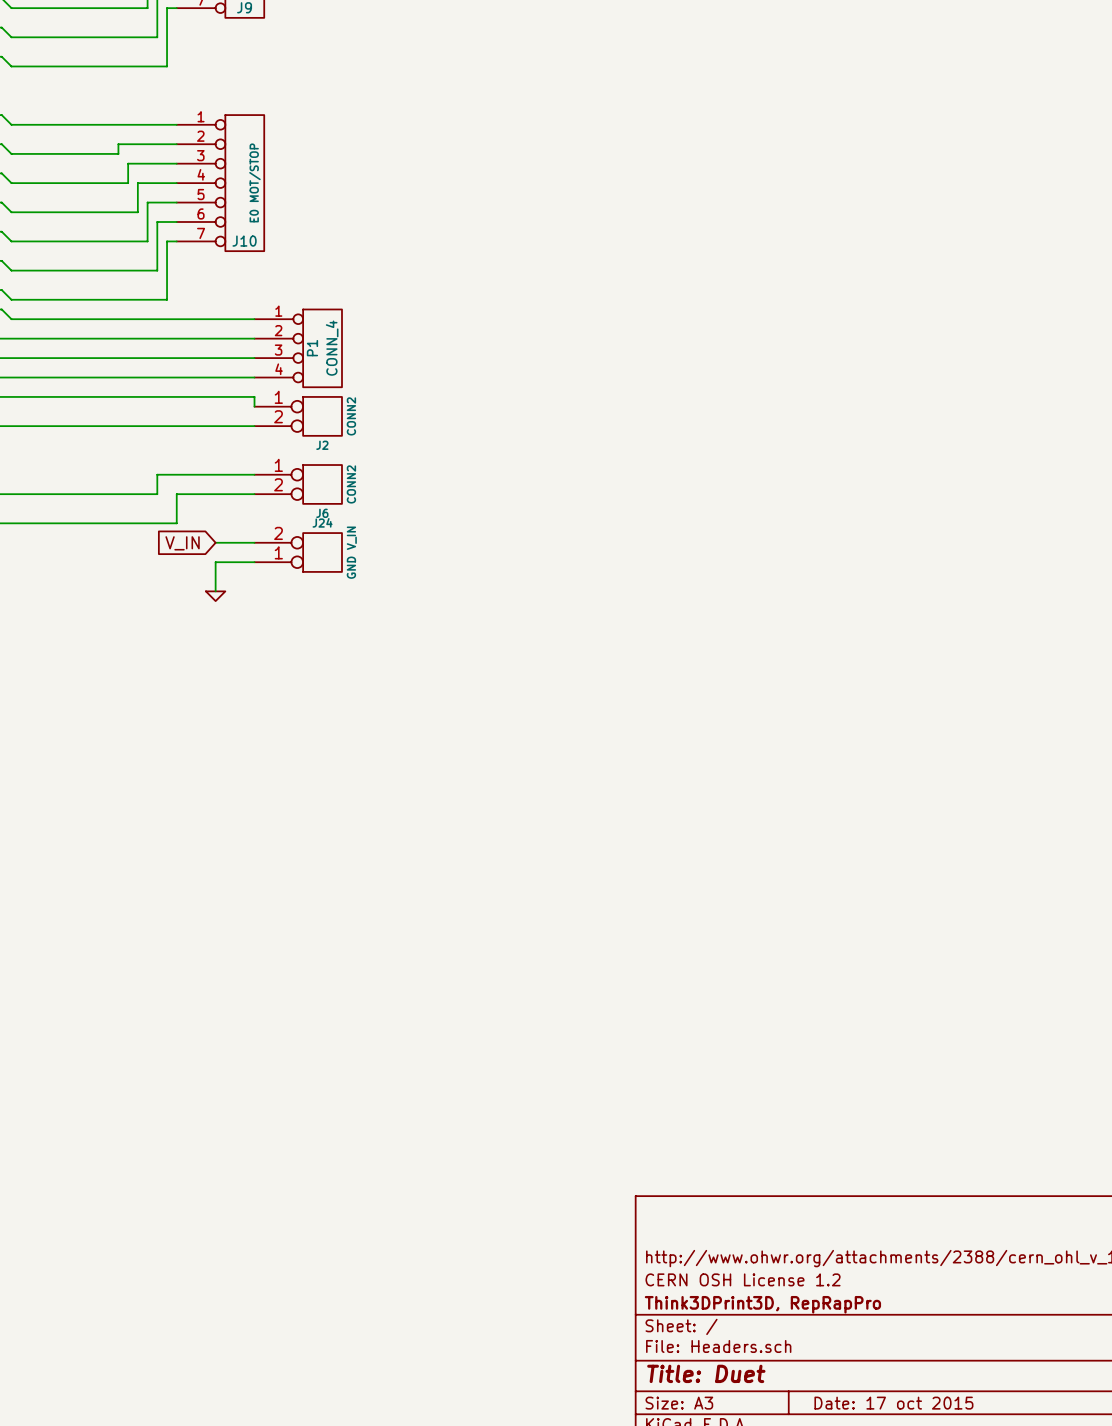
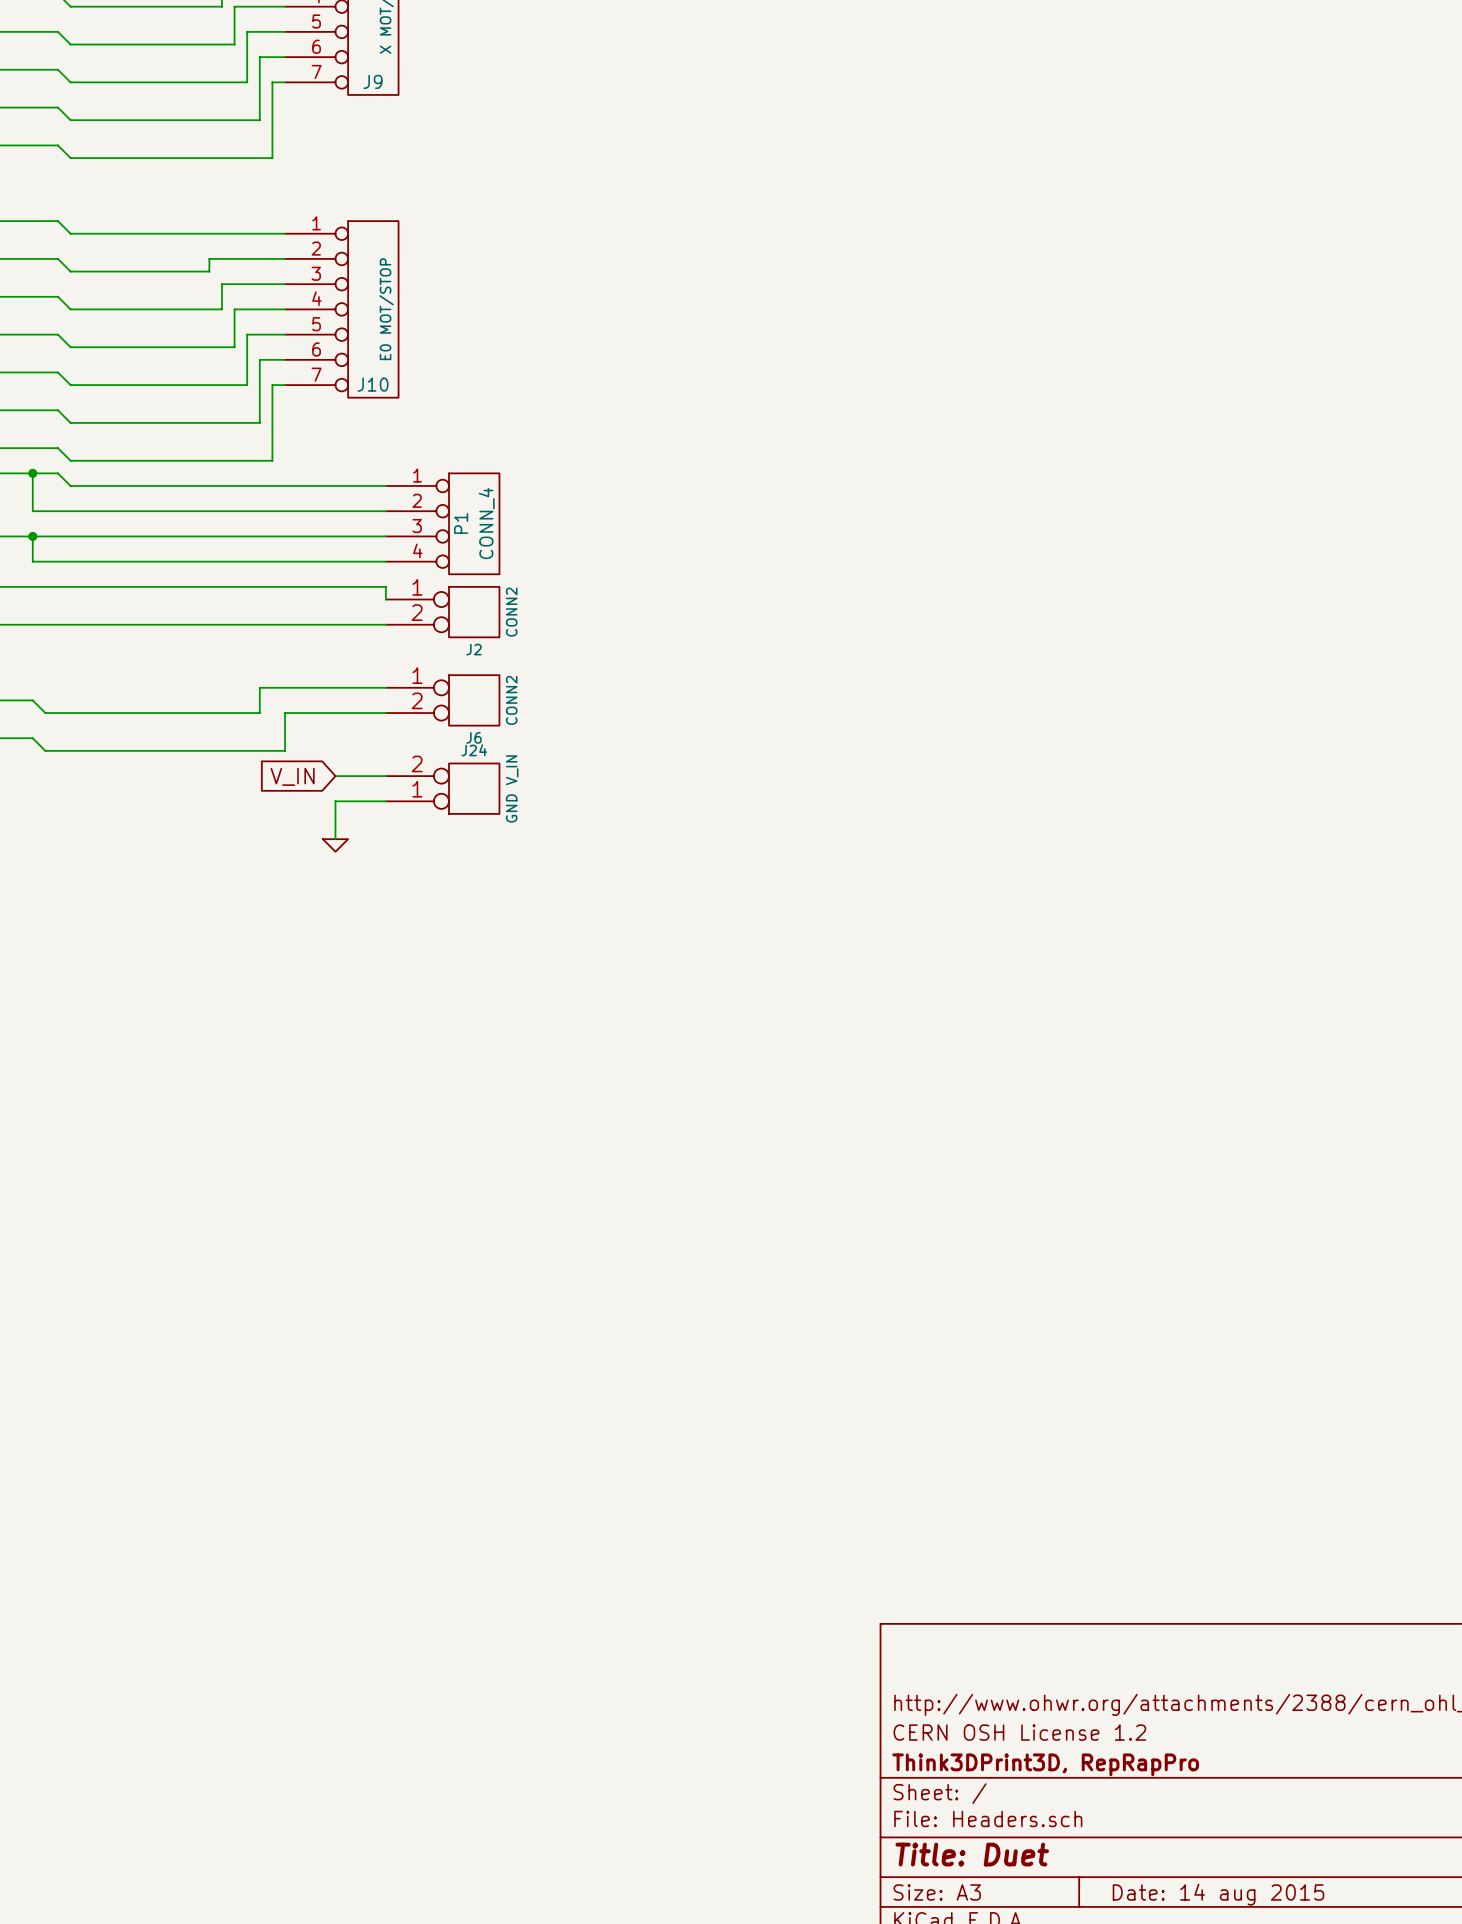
title block: Date: 17 oct 2015 (893, 1403) -> Date: 14 aug 2015 (1218, 1894)

